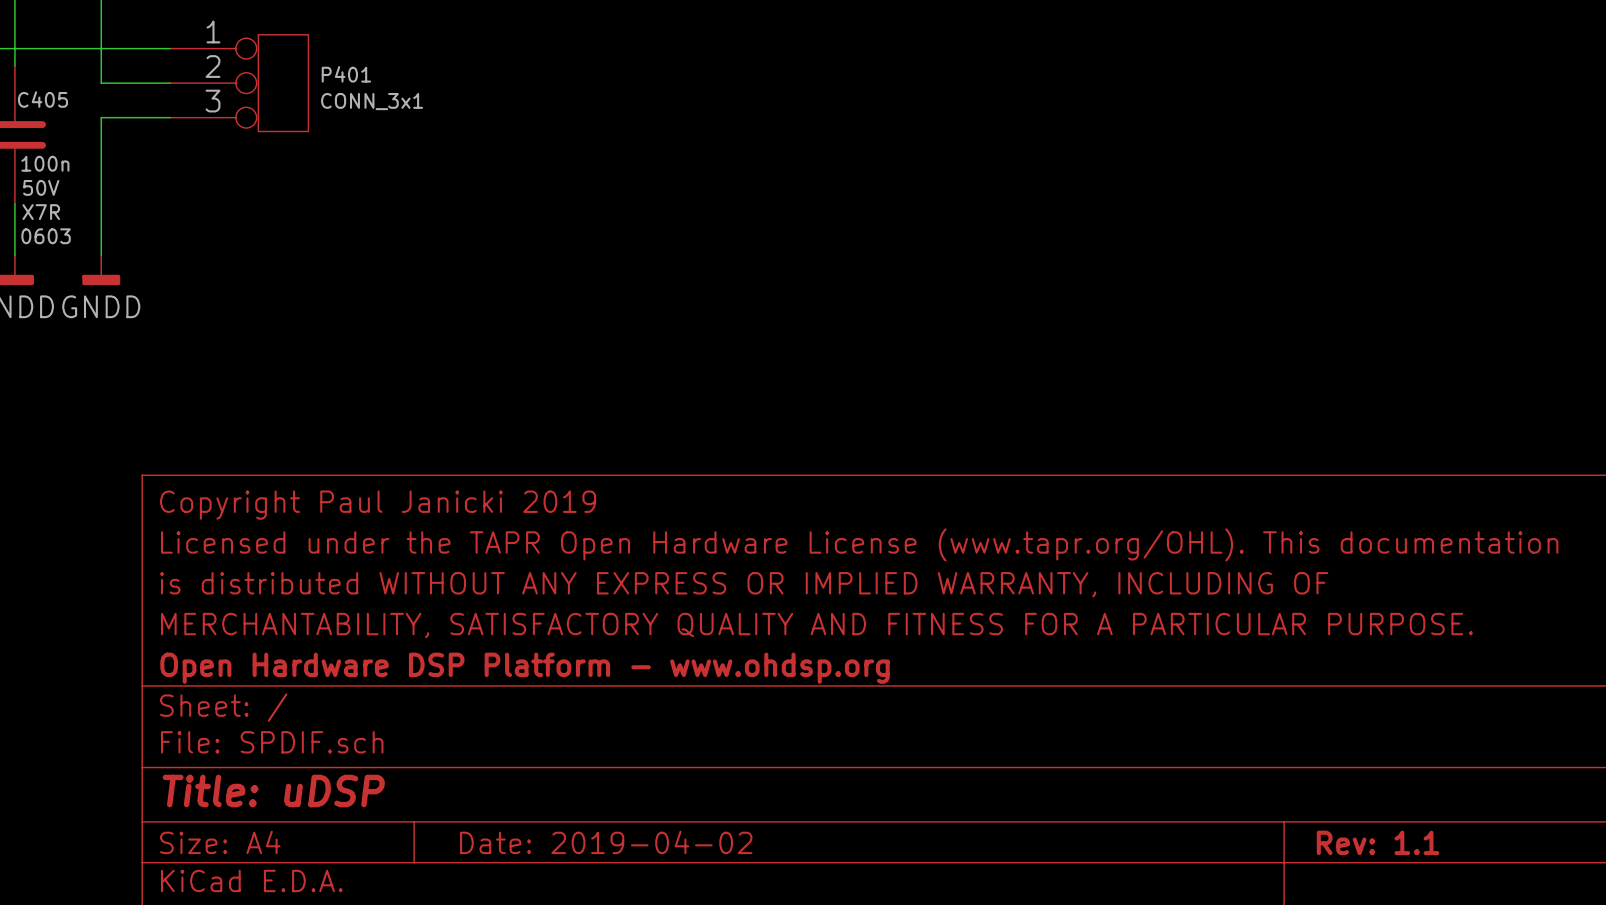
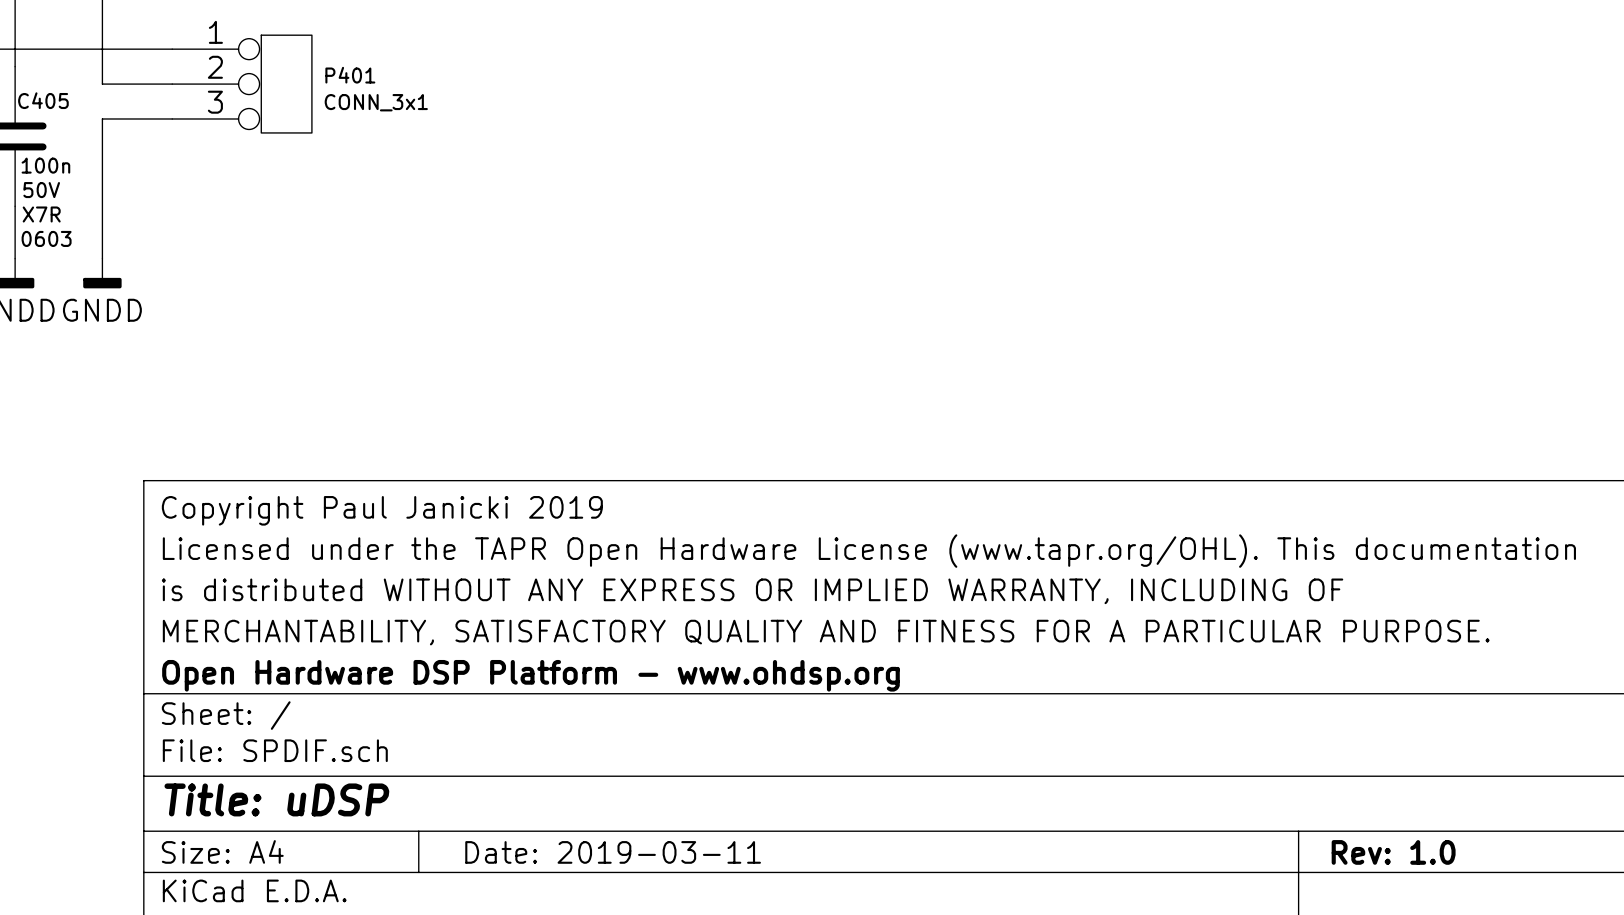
title block: Date: 2019-04-02 (606, 842) -> Date: 2019-03-11 (613, 852)
title block: Rev: 1.1 (1378, 842) -> Rev: 1.0 (1393, 852)

